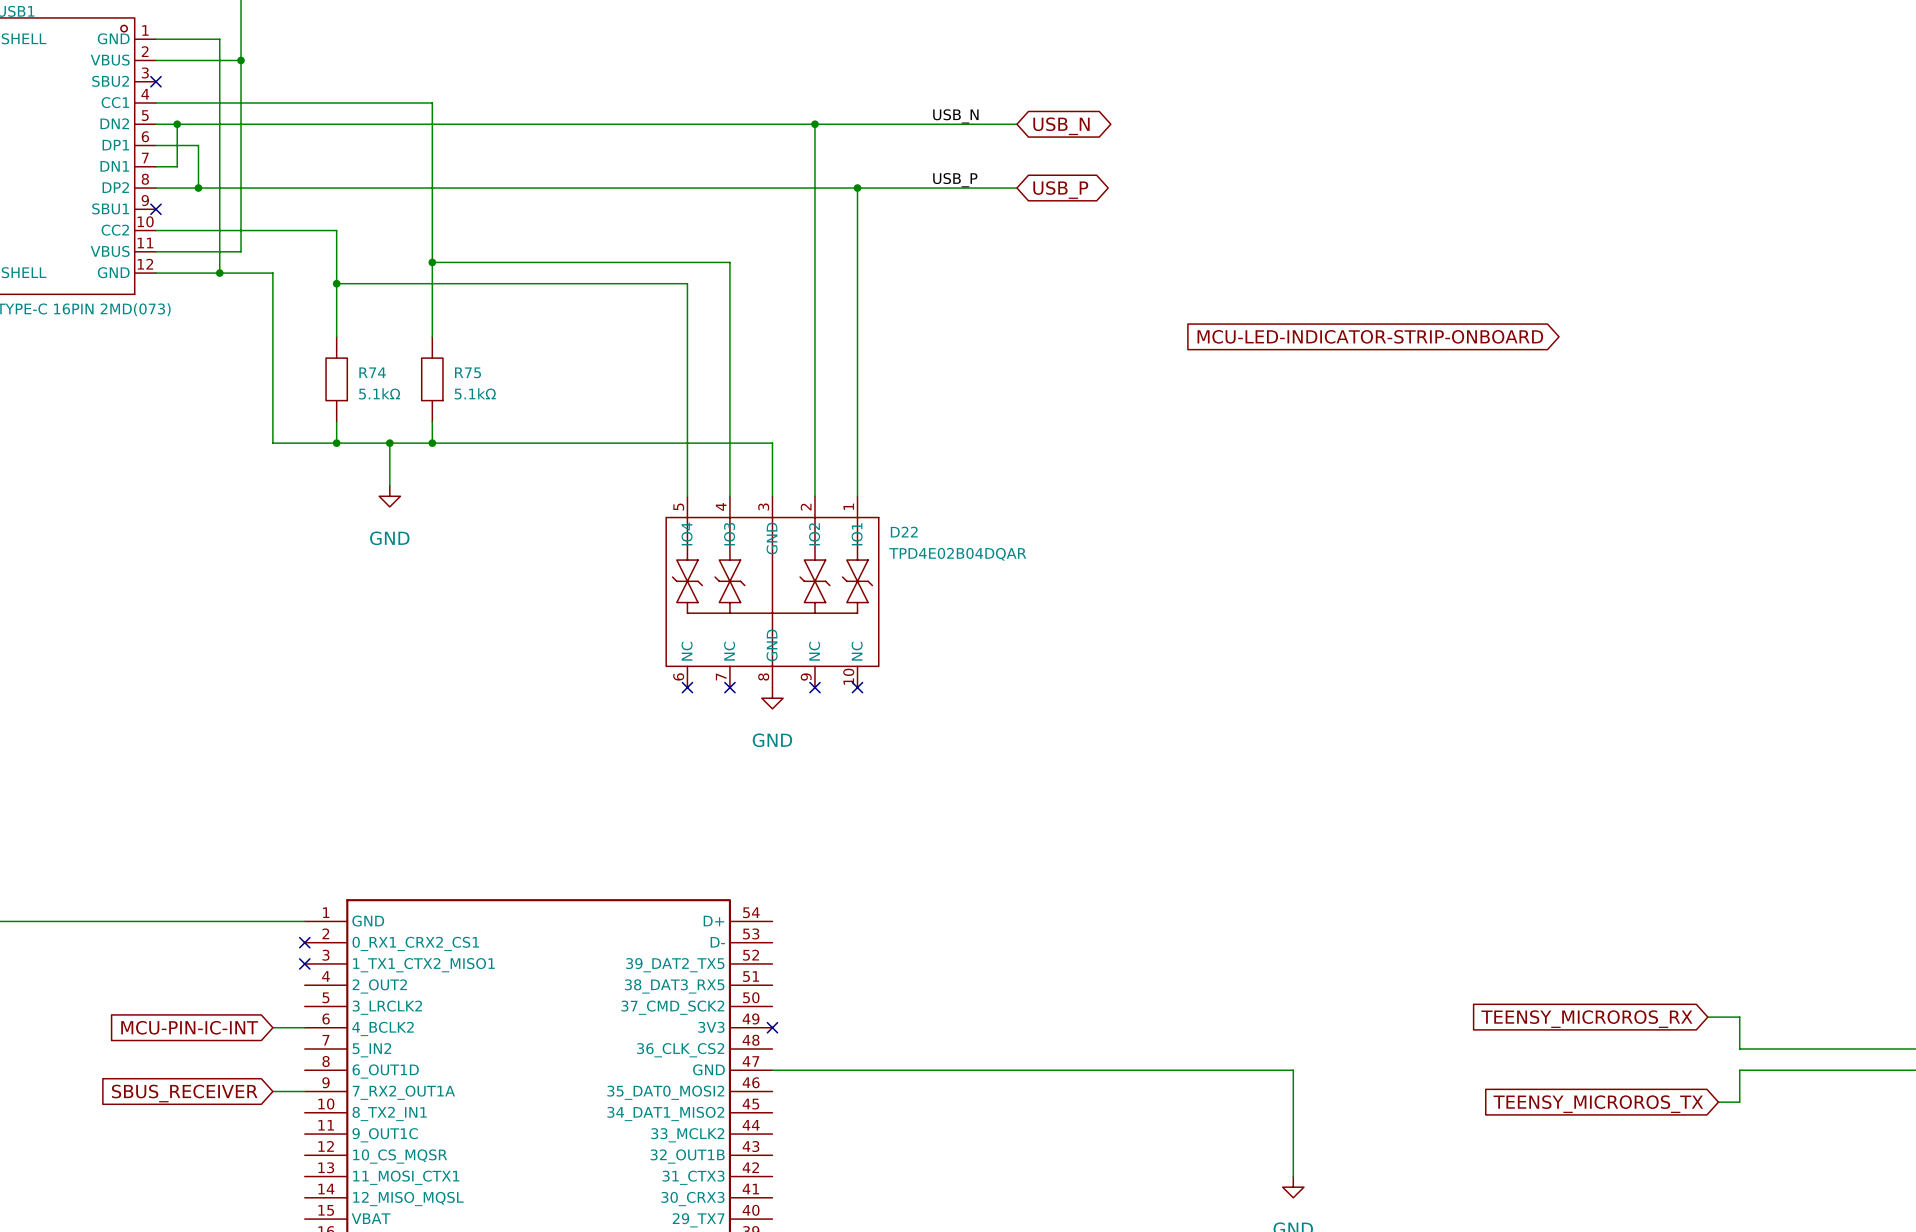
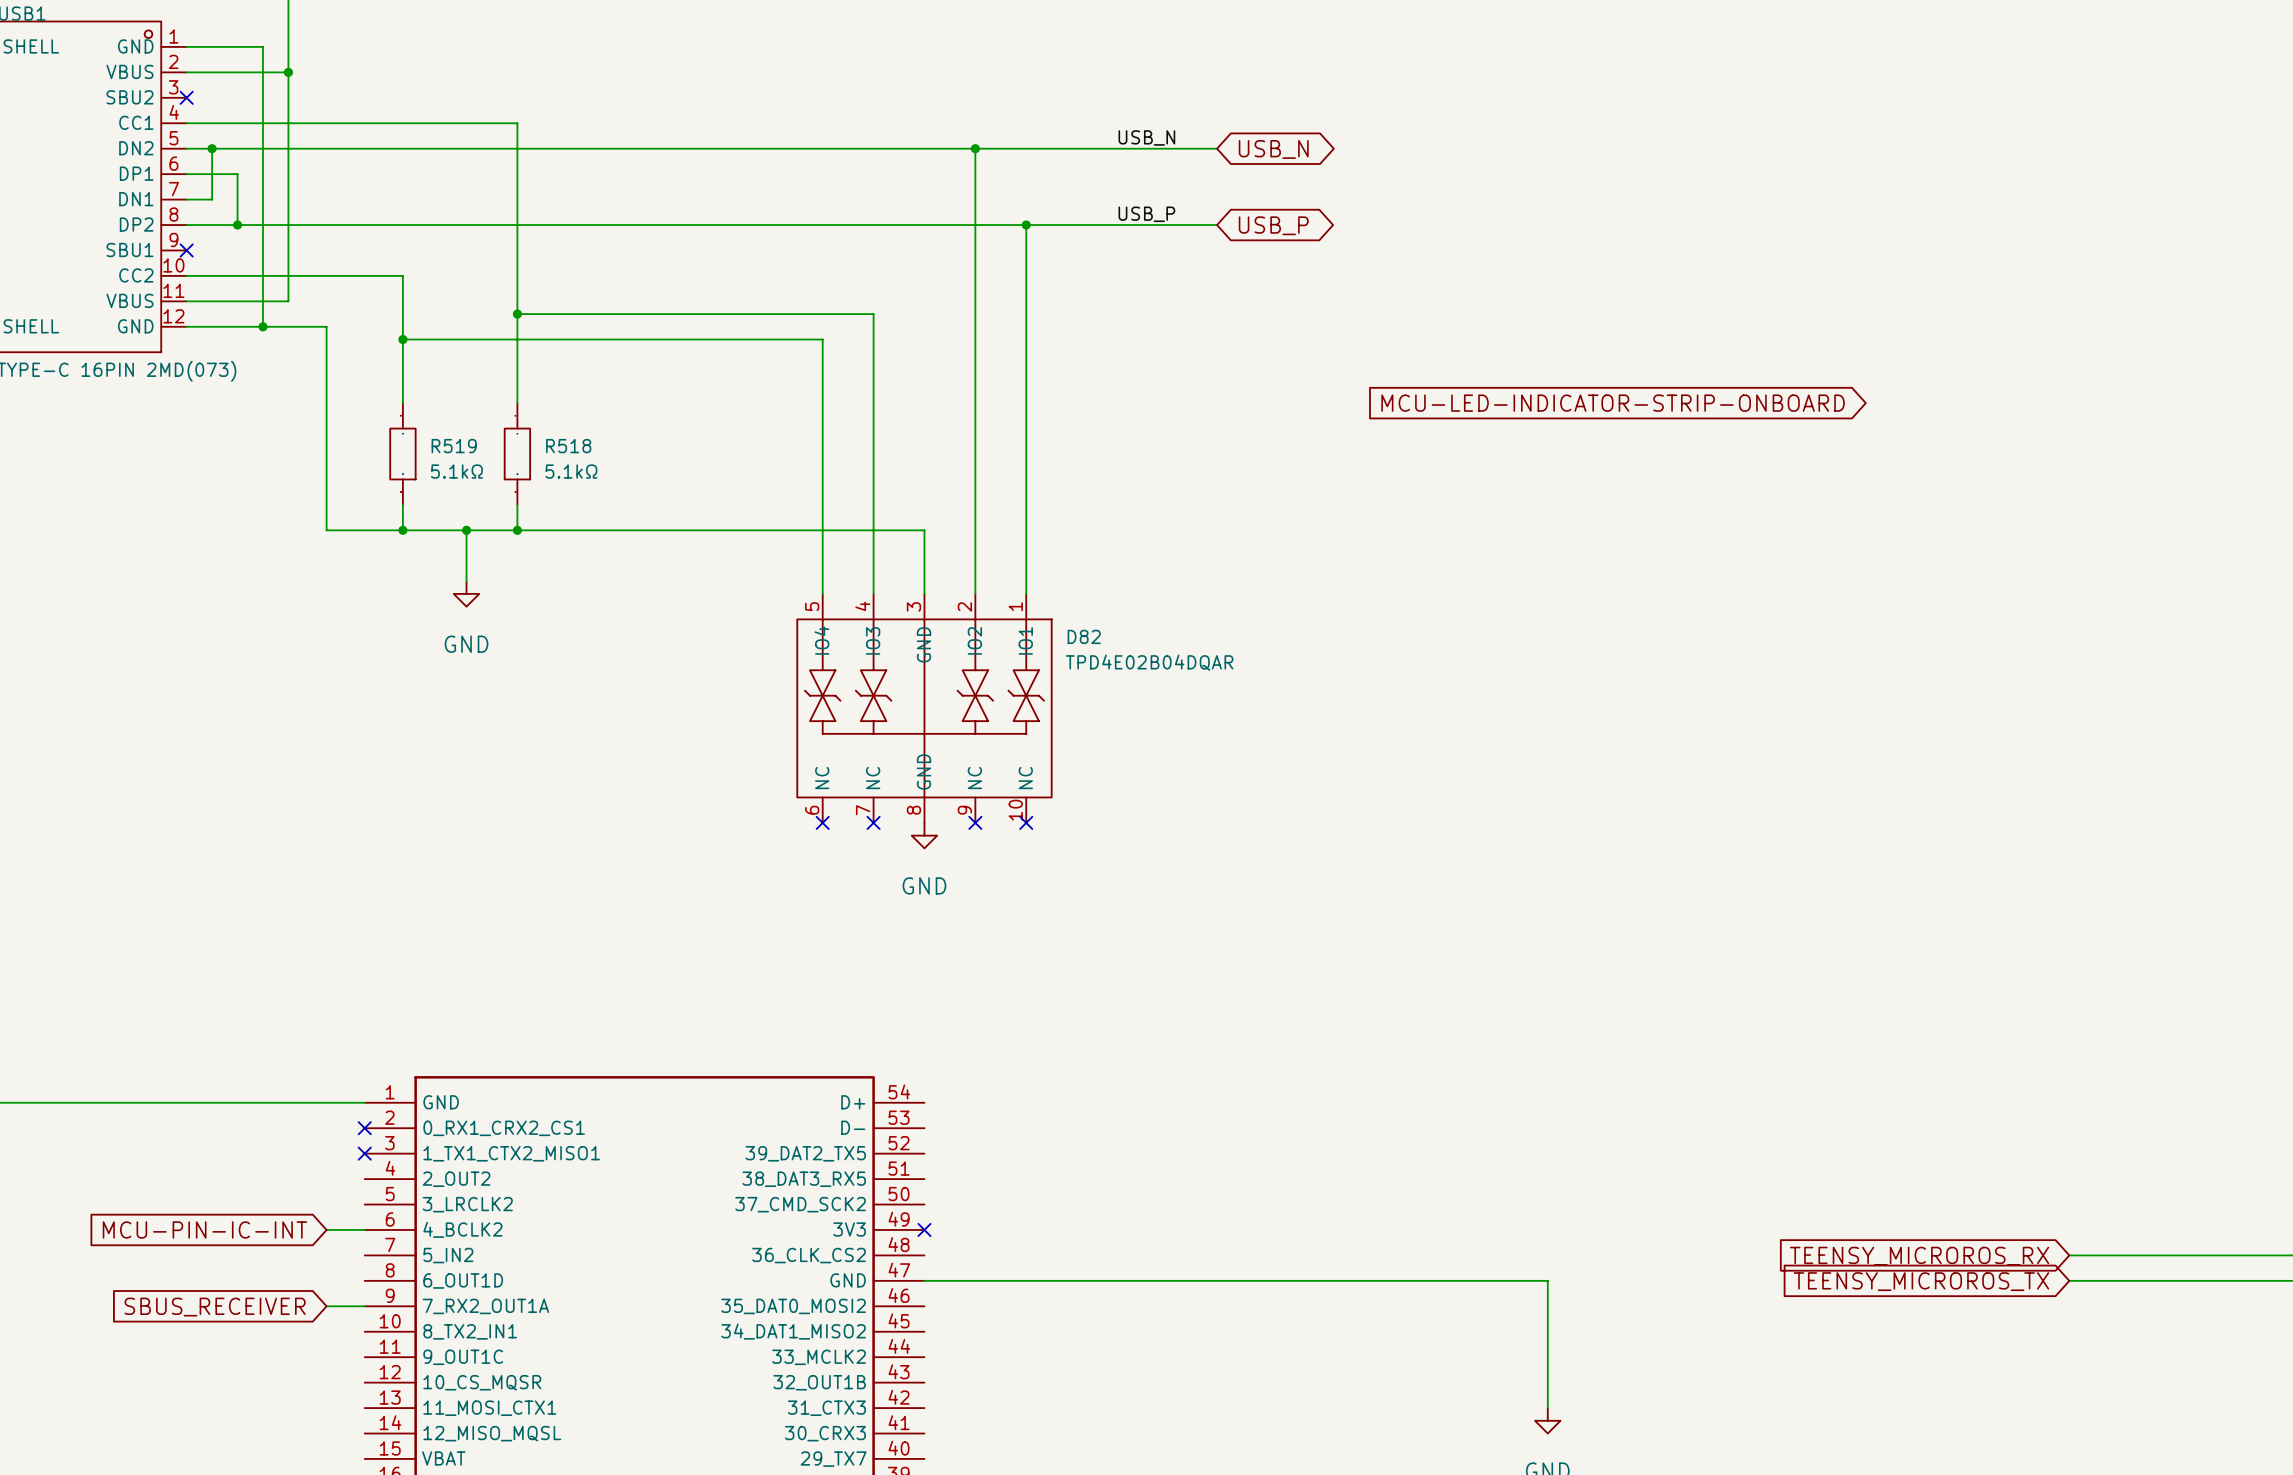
R74 name: R74 (372, 372) -> R519 (454, 446)
R75 name: R75 (468, 372) -> R518 (568, 446)
D22 name: D22 (904, 532) -> D82 (1084, 636)
wire: (1707, 1017) (1739, 1017) (1739, 1049) -> (2069, 1255) (2082, 1255)
global label position: TEENSY_MICROROS_RX (1586, 1019) -> TEENSY_MICROROS_RX (1919, 1256)
wire: (1739, 1070) (1739, 1102) (1718, 1102) -> (2082, 1280) (2069, 1280)
global label position: TEENSY_MICROROS_TX (1598, 1104) -> TEENSY_MICROROS_TX (1921, 1281)

